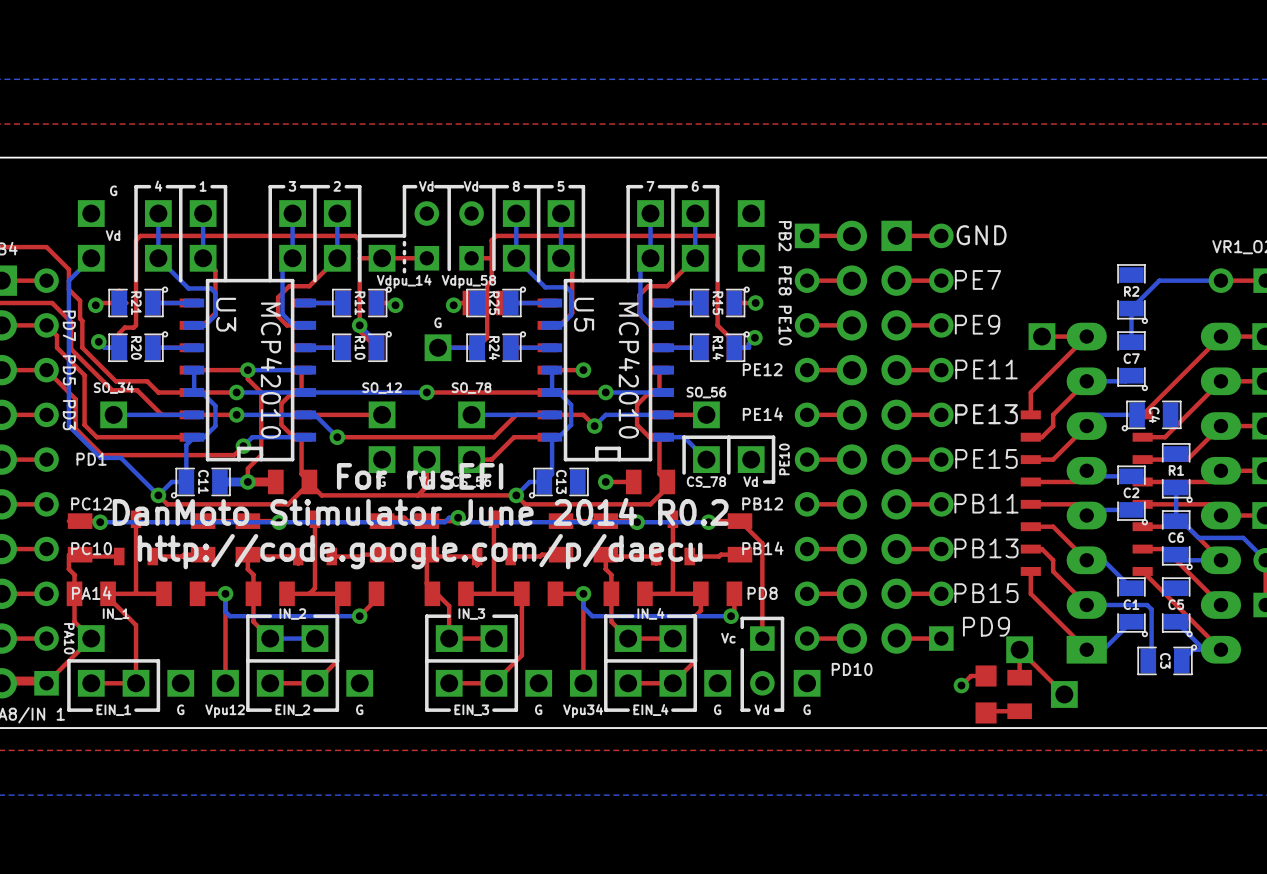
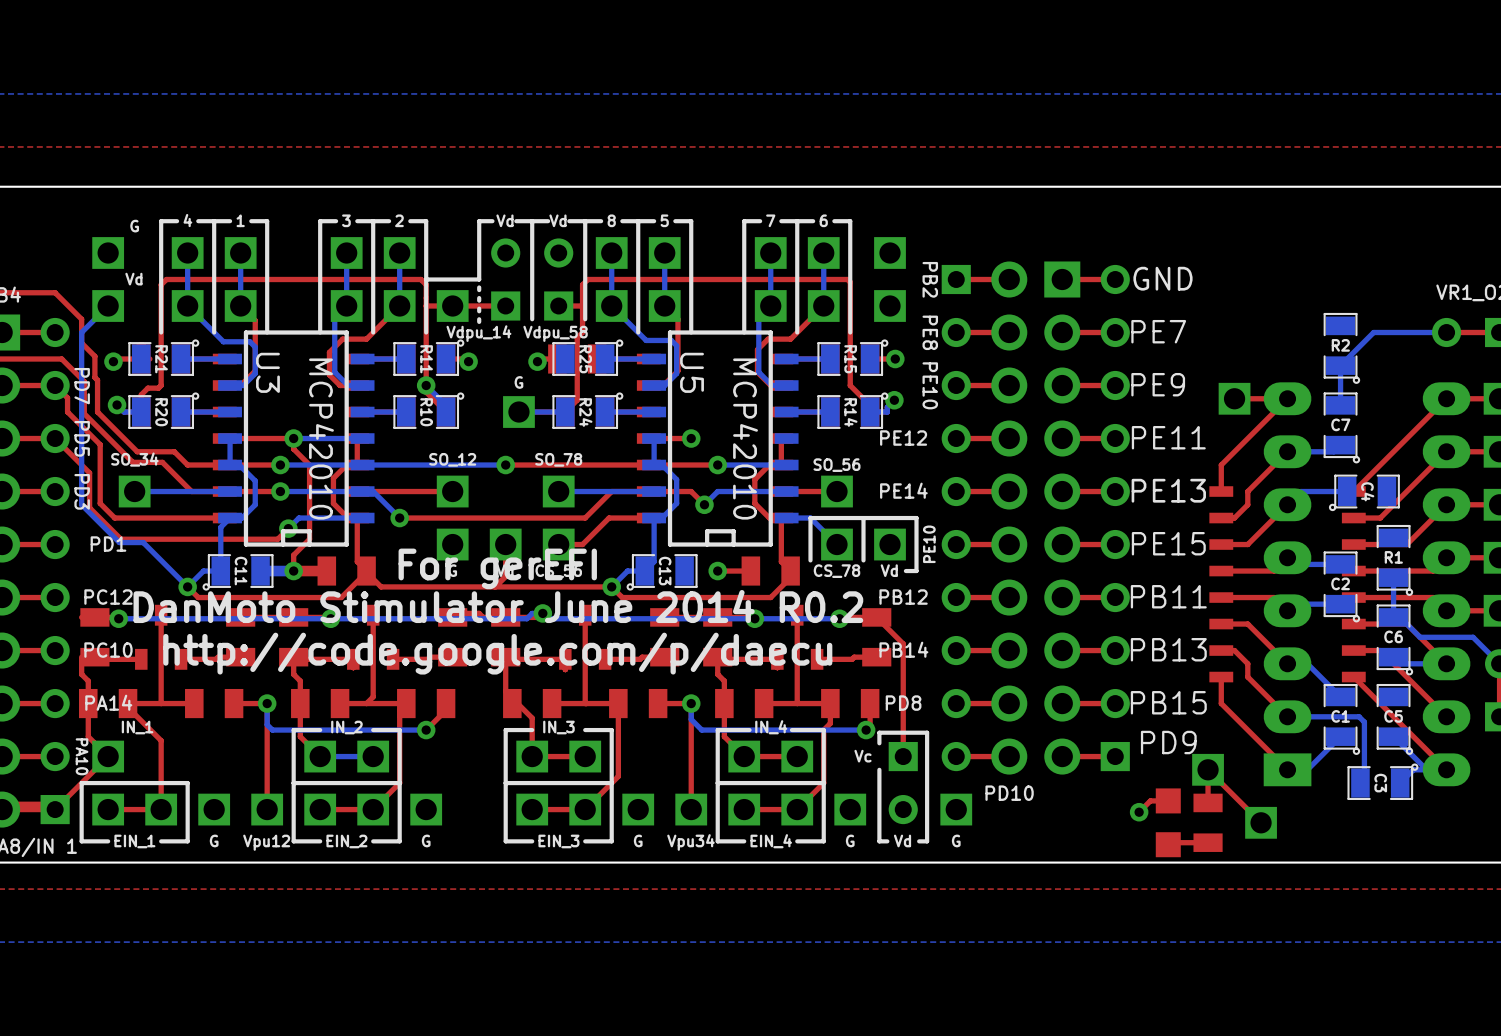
text: For rusEFI (420, 476) -> For gerEFI (497, 568)

